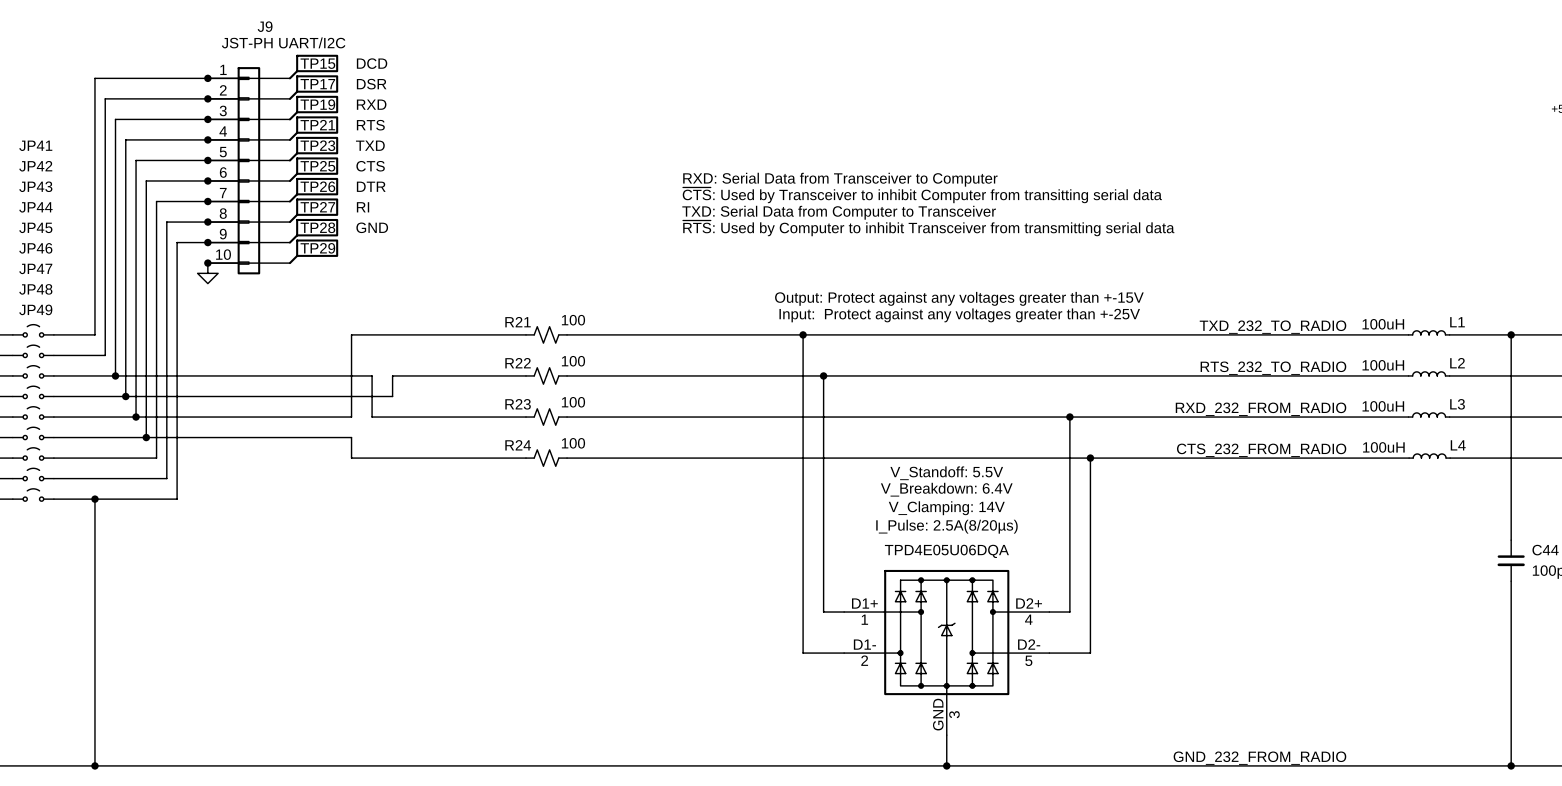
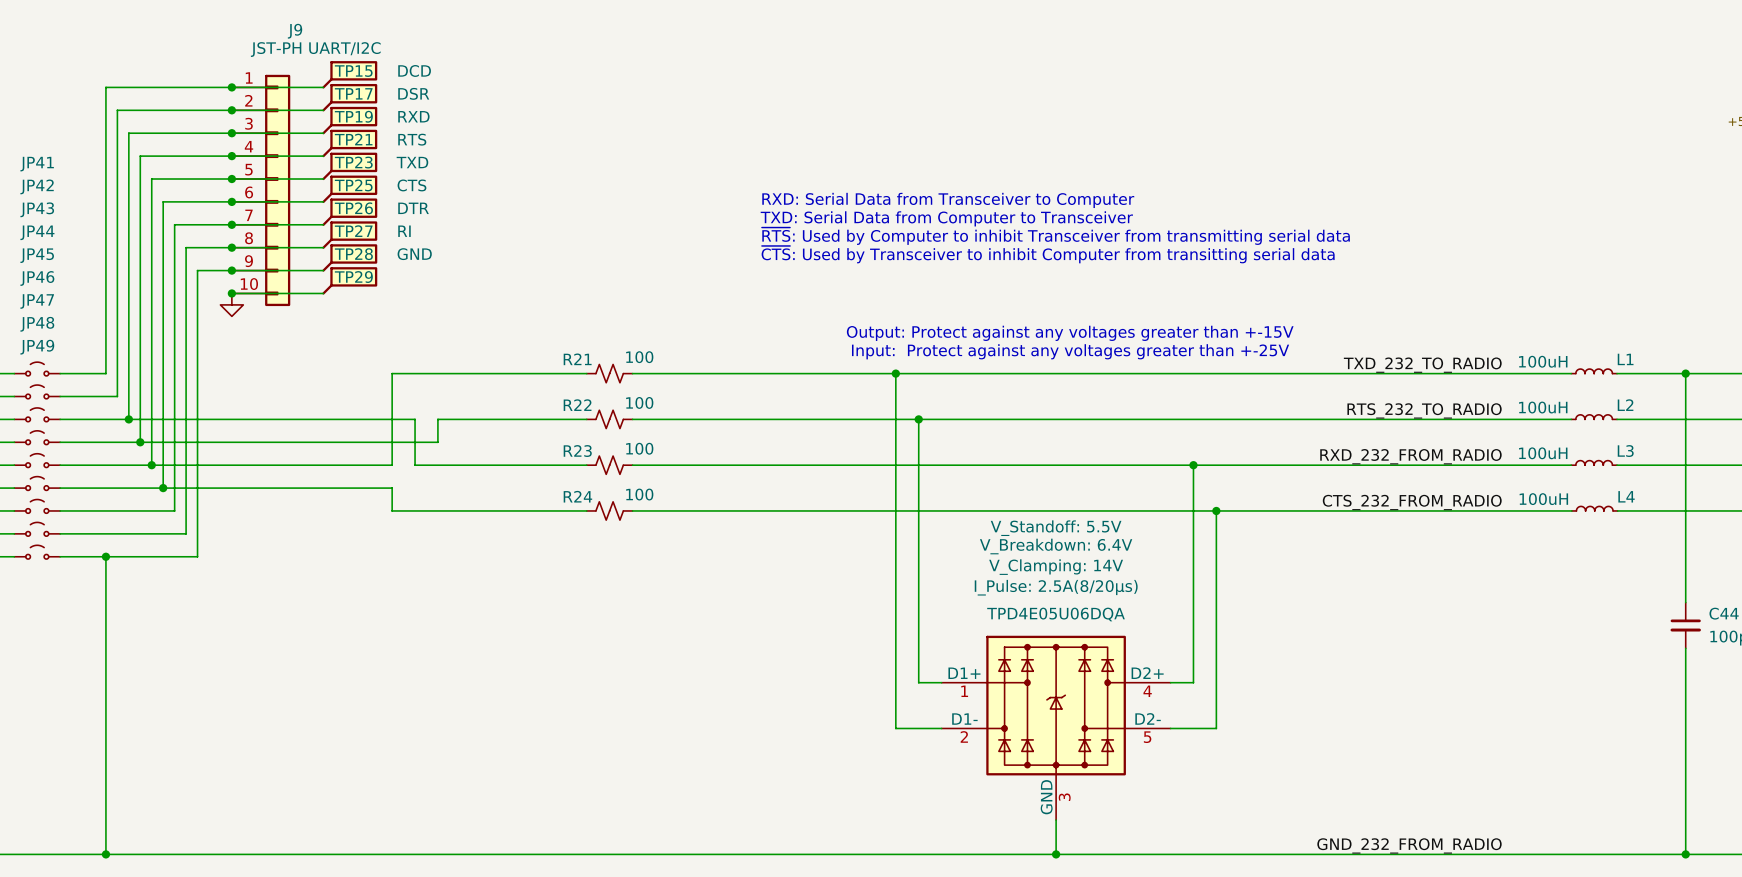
text: ~{CTS}: Used by Transceiver to inhibit Computer from transitting serial data (922, 195) -> TXD: Serial Data from Computer to Transceiver (946, 218)
text: TXD: Serial Data from Computer to Transceiver (839, 212) -> ~{RTS}: Used by Computer to inhibit Transceiver from transmitting serial data (1055, 236)
text: ~{RTS}: Used by Computer to inhibit Transceiver from transmitting serial data (928, 228) -> ~{CTS}: Used by Transceiver to inhibit Computer from transitting serial data (1048, 254)

